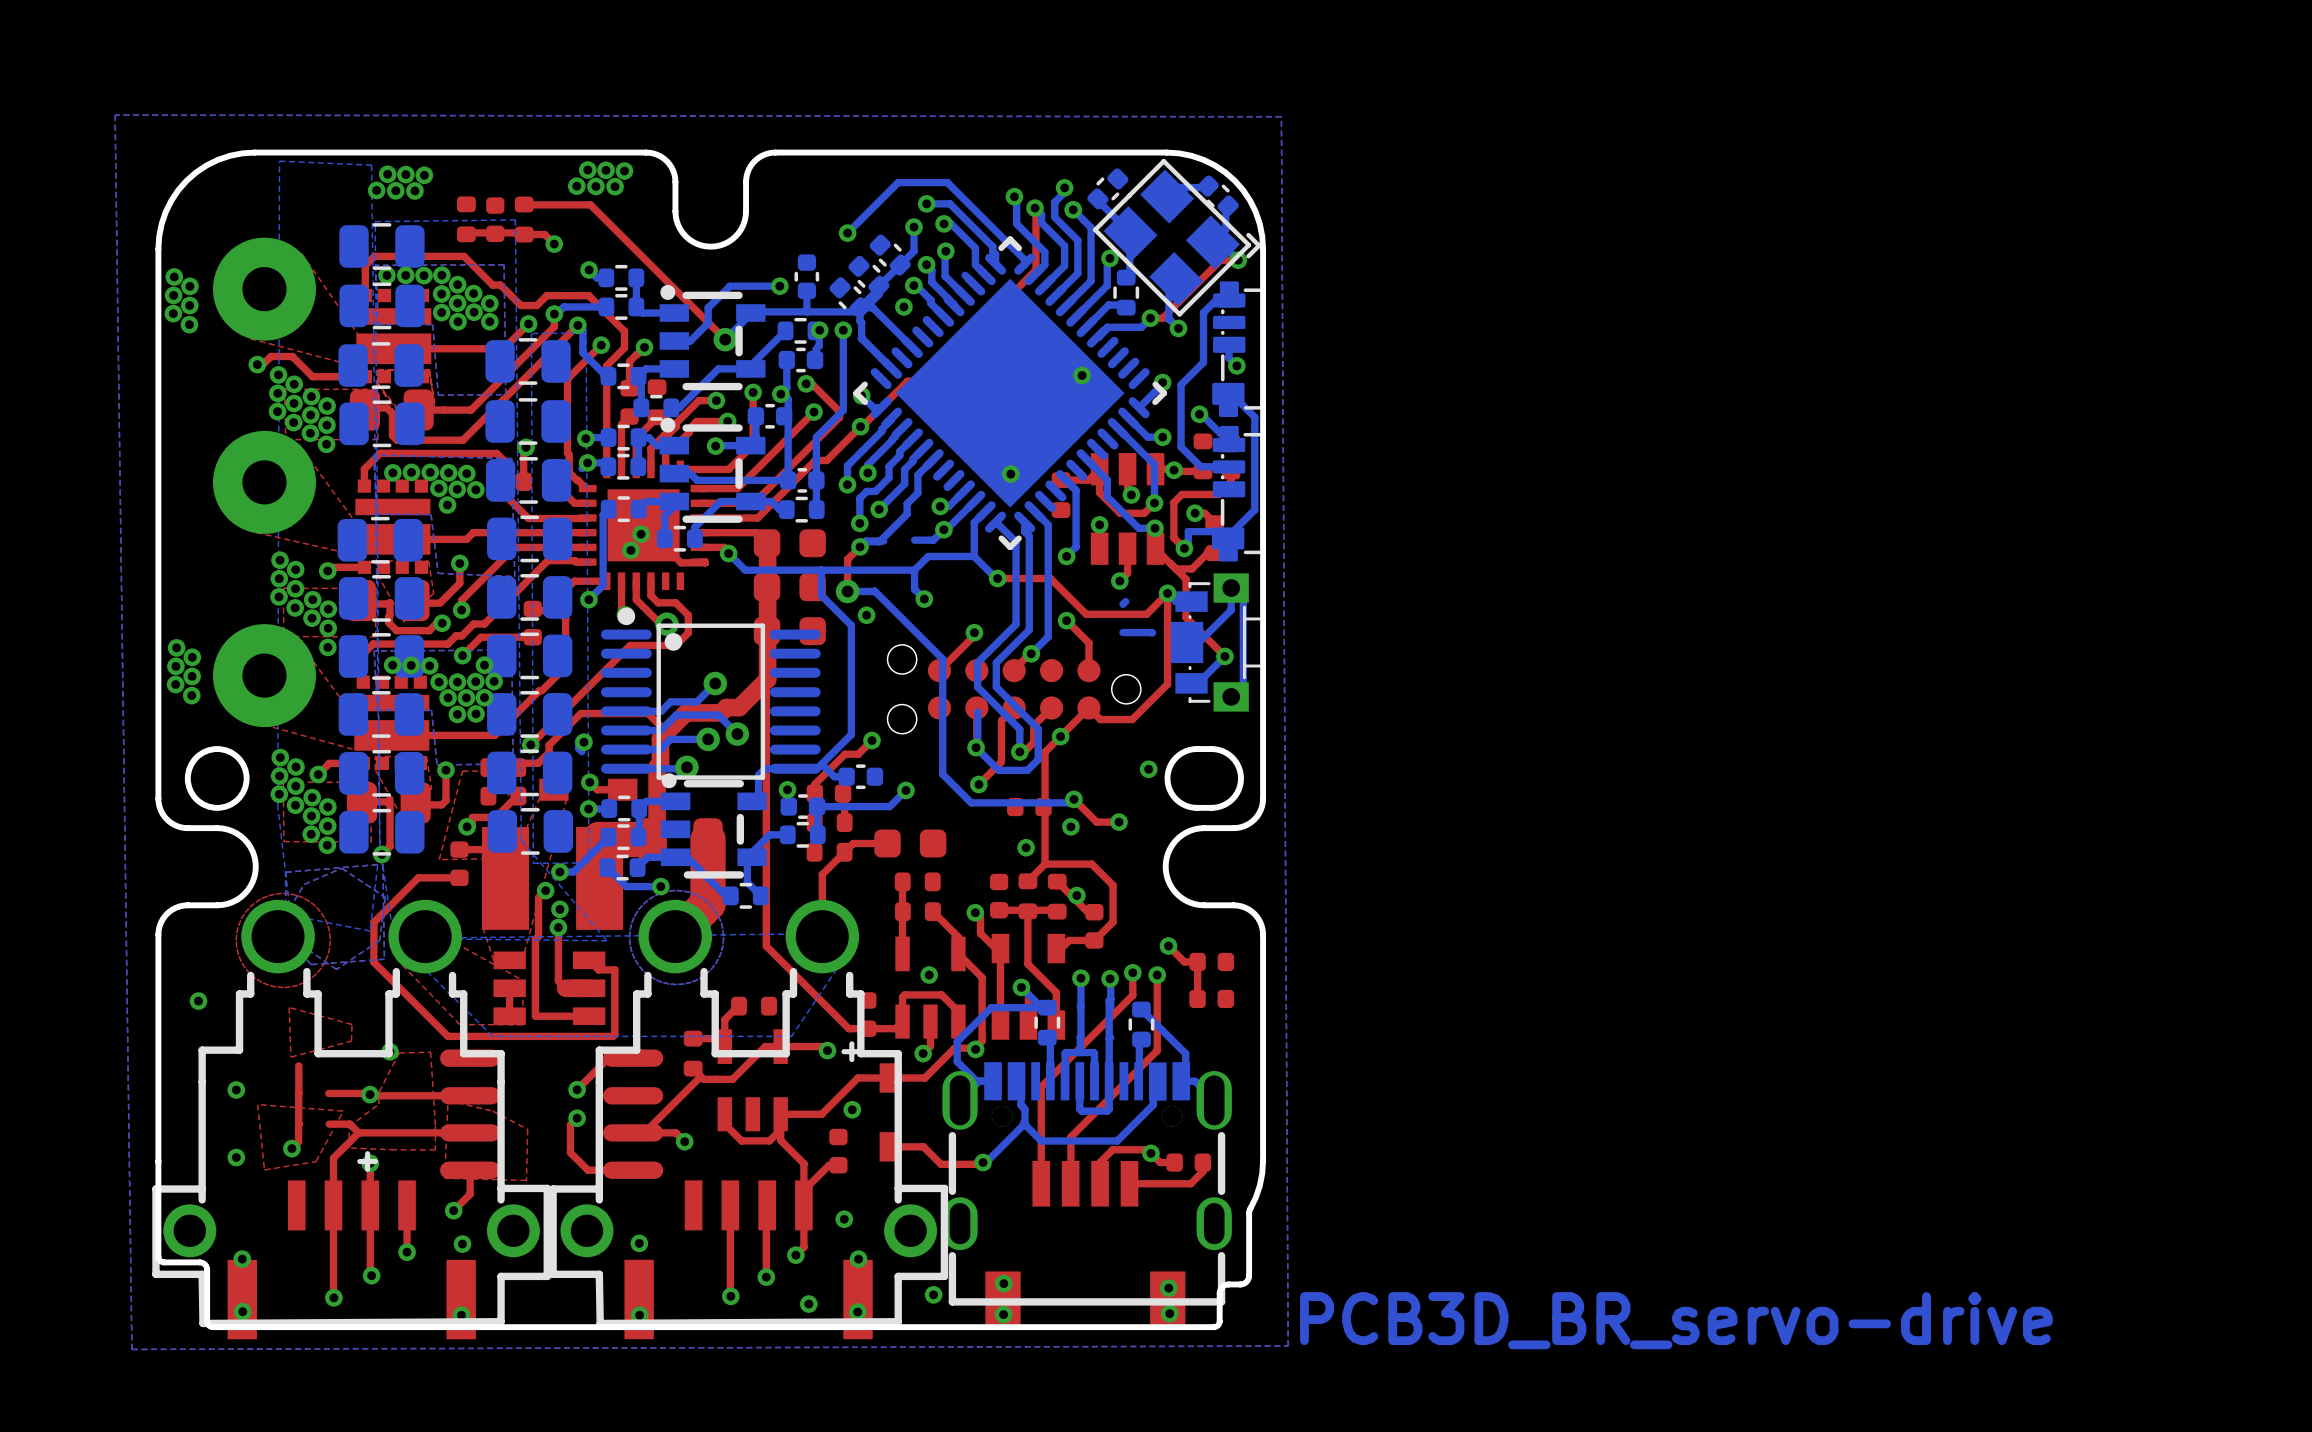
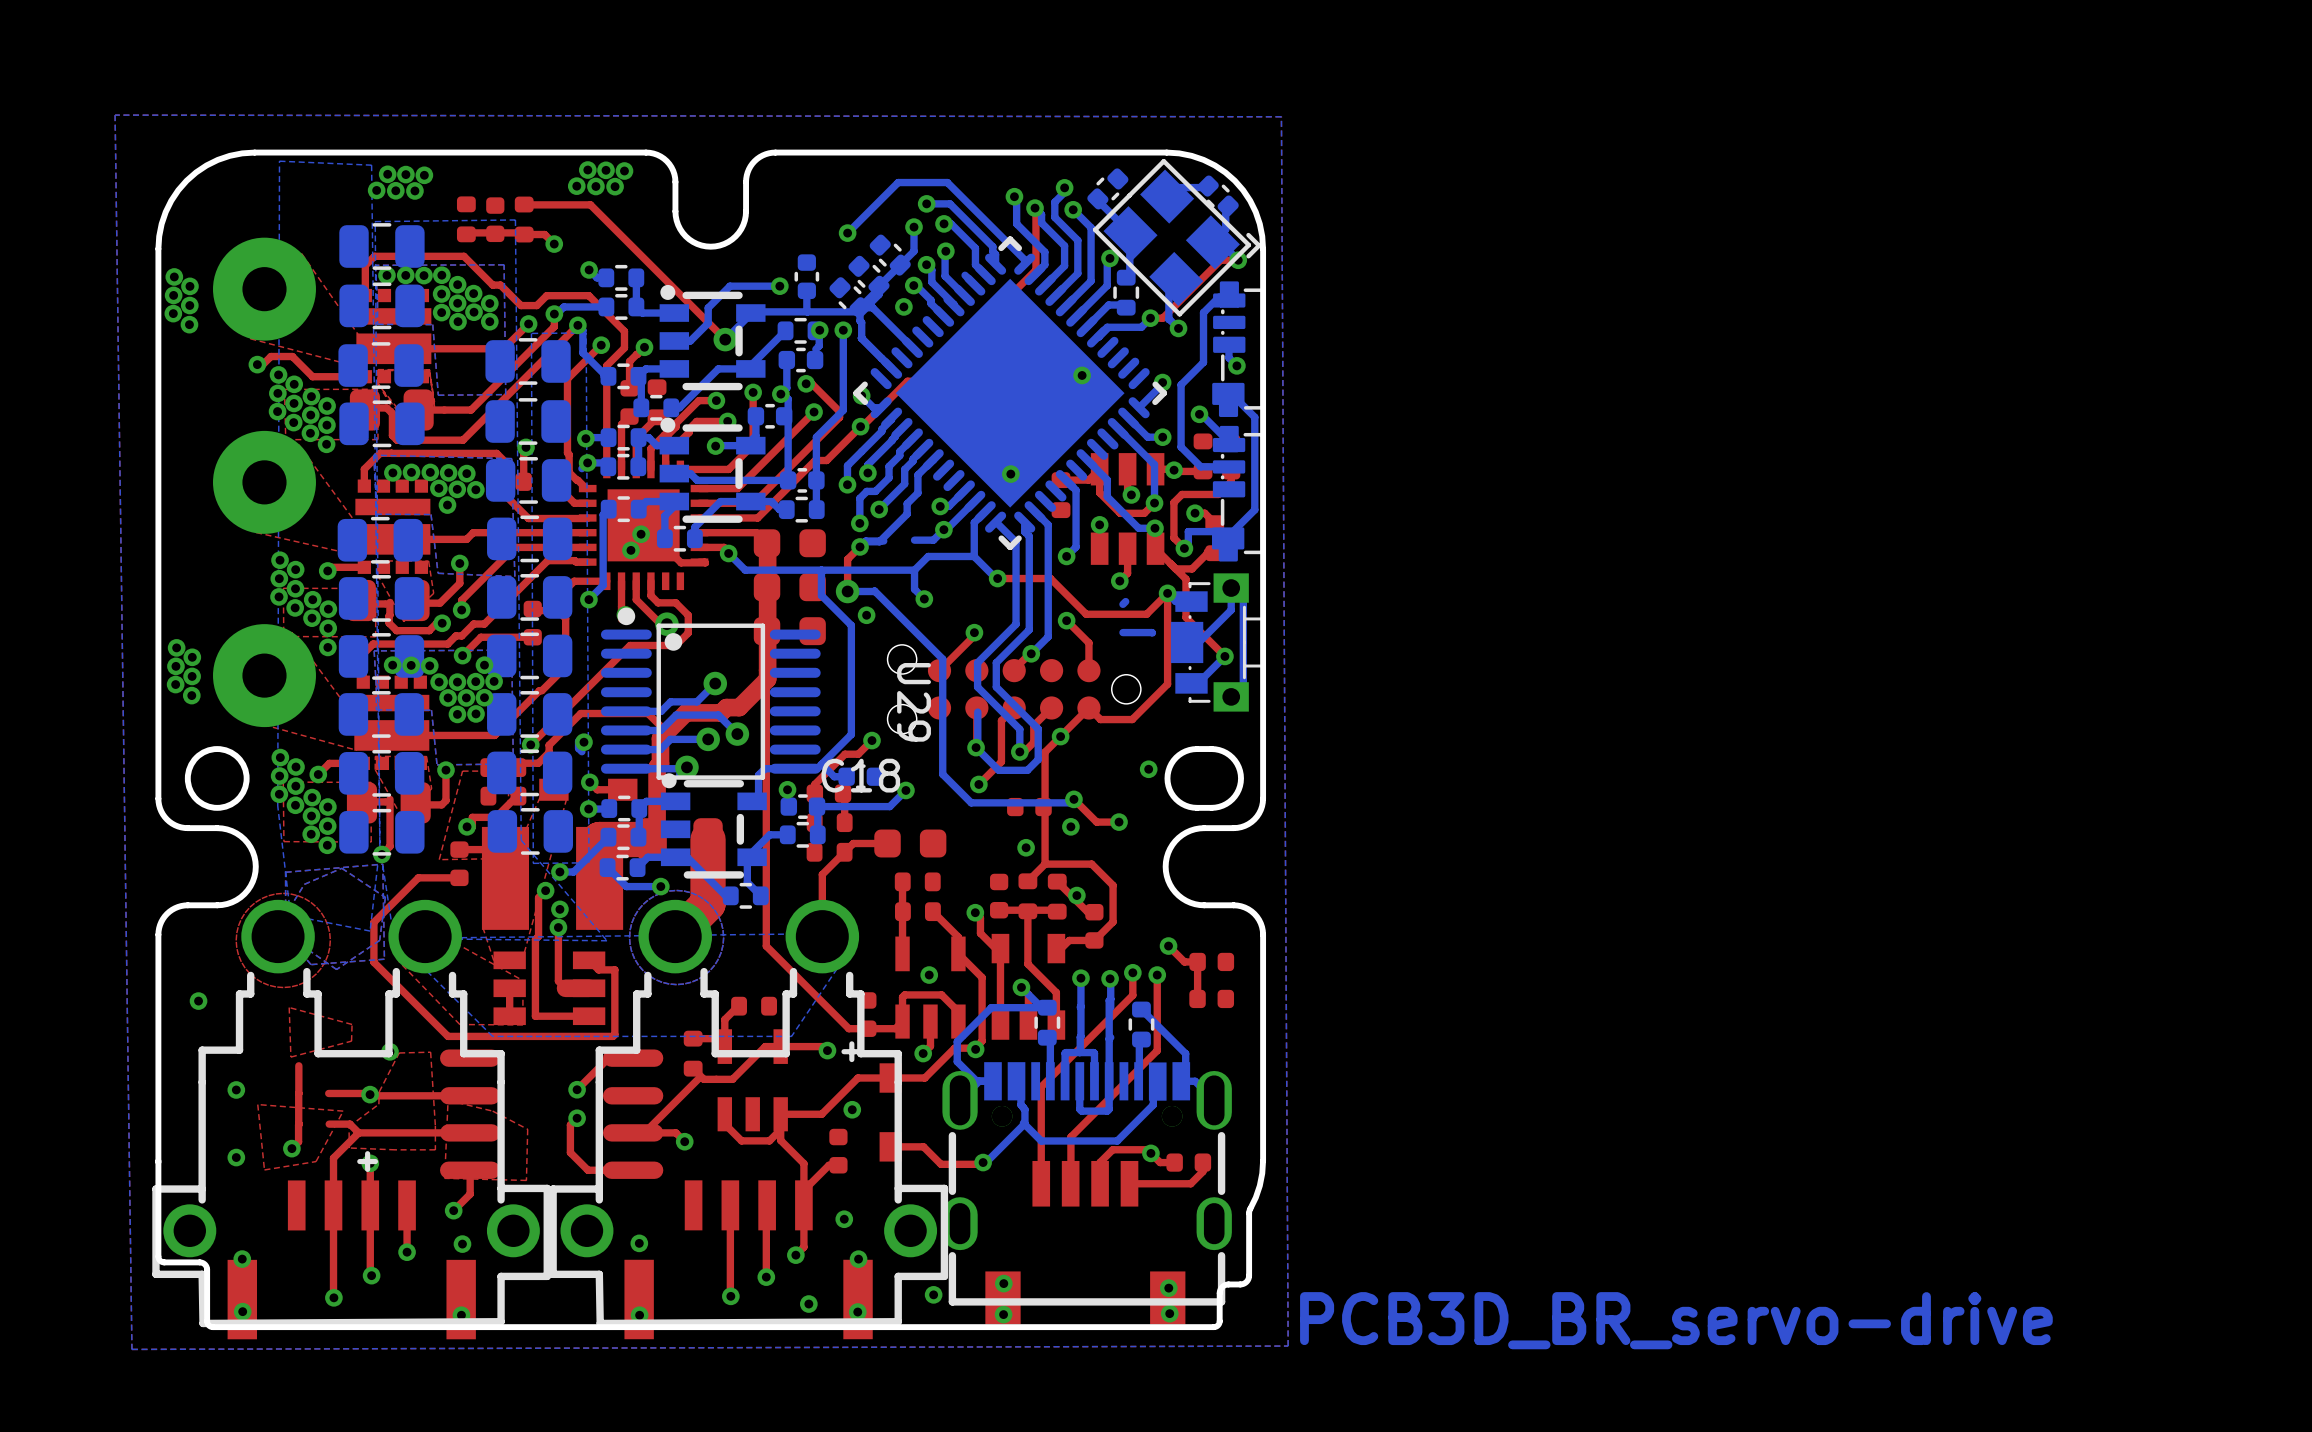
U29 name: none -> U29 (914, 702)
C18 name: none -> C18 (860, 775)

